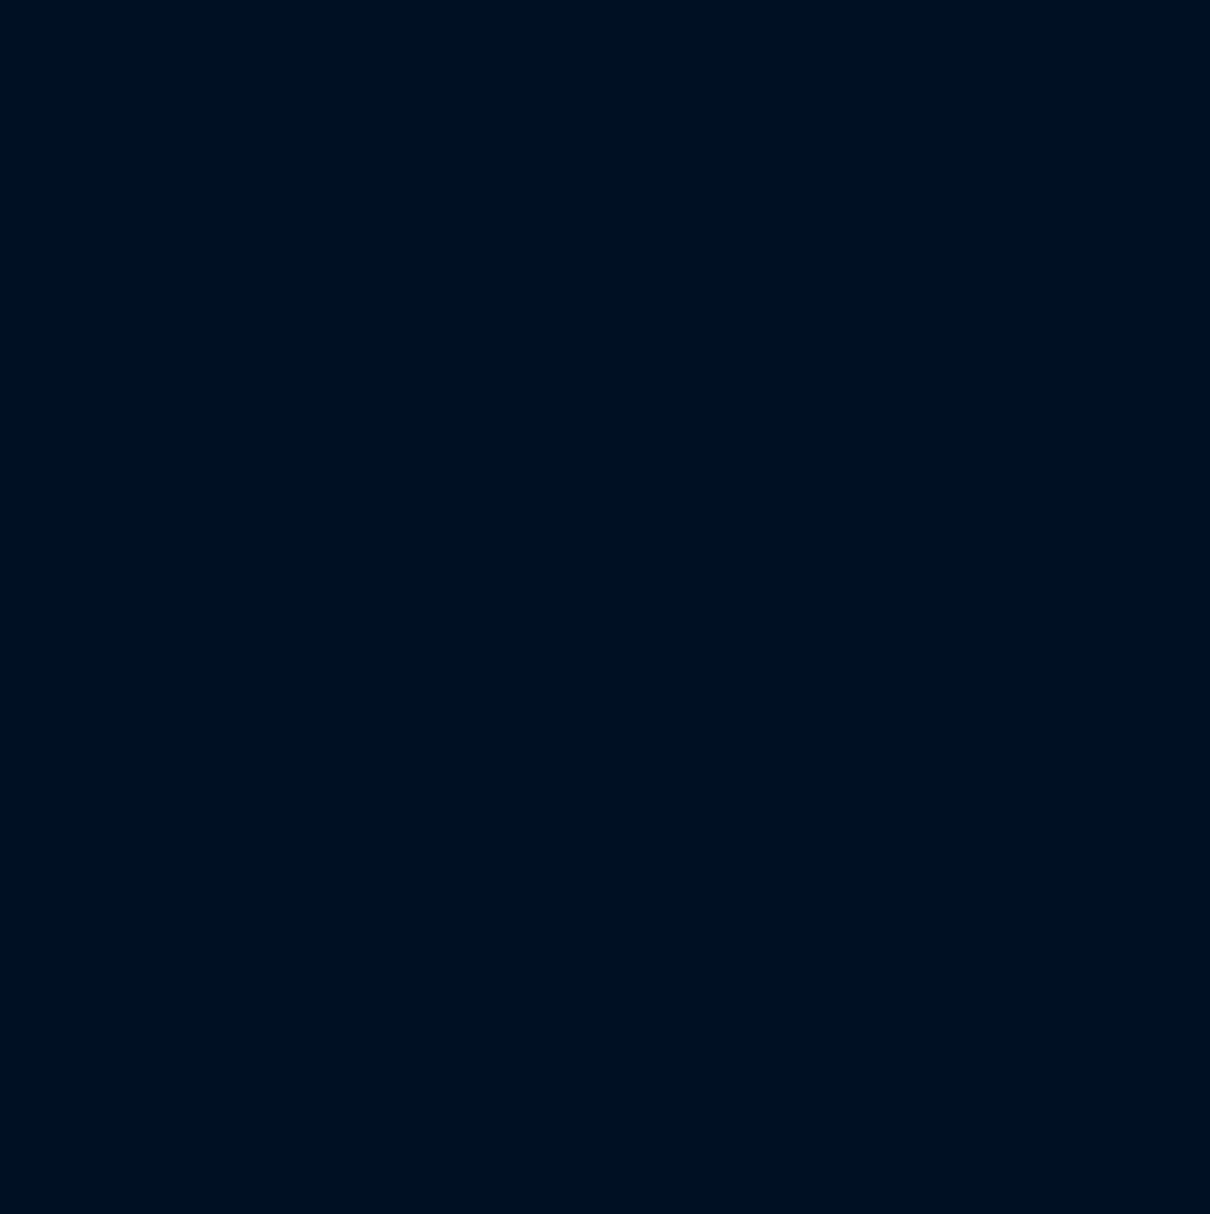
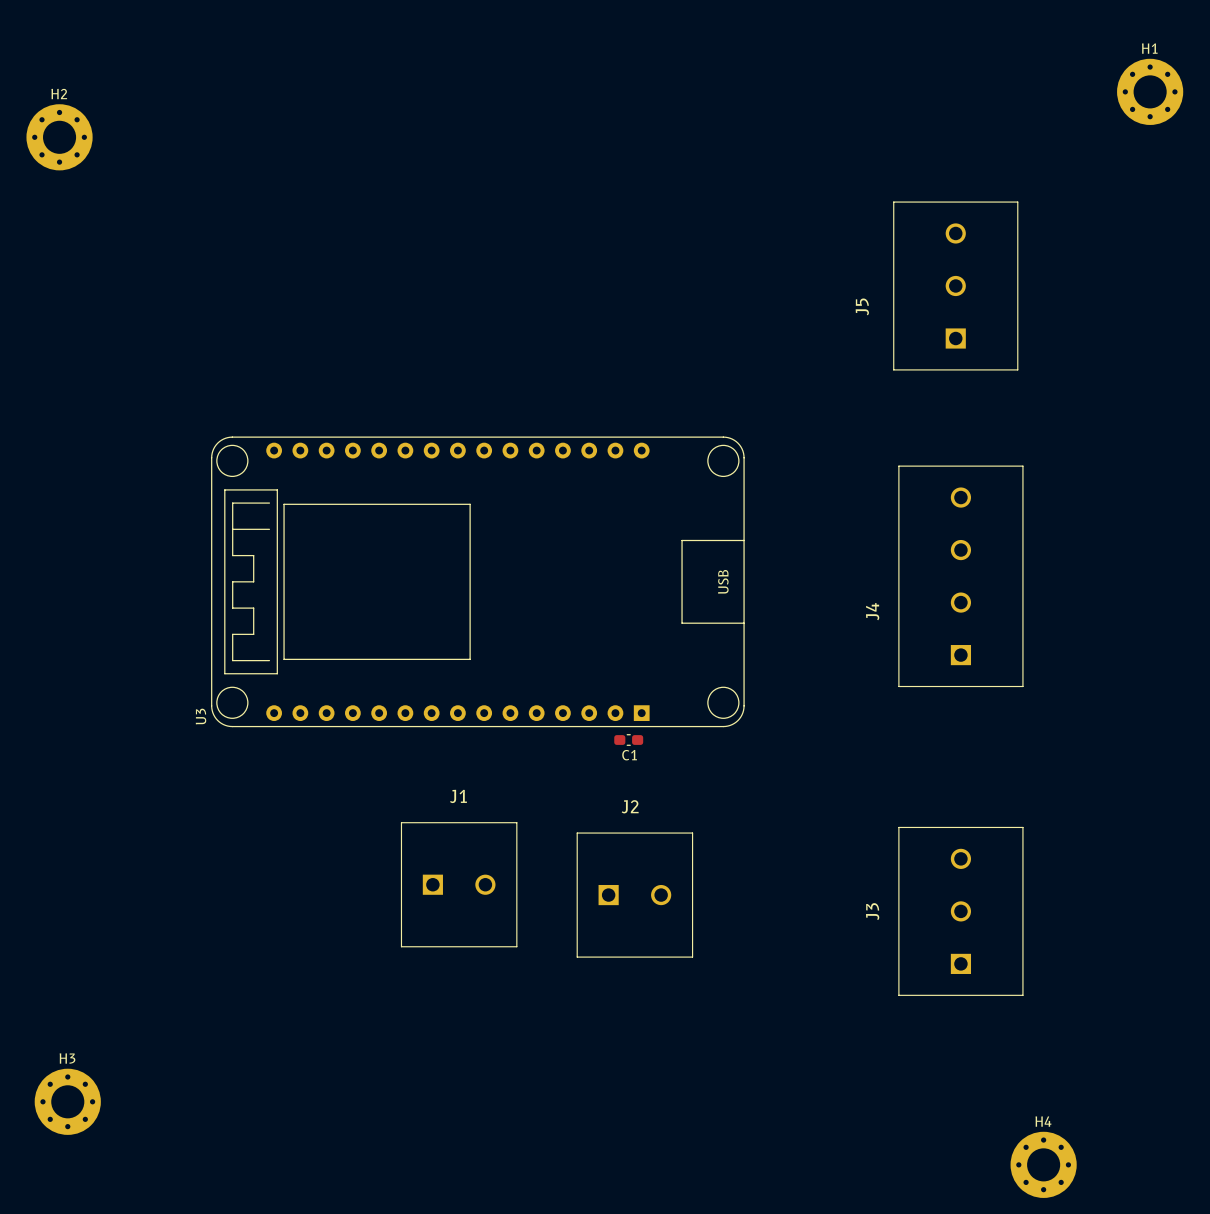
H1: none -> (1150, 91)
H2: none -> (59, 137)
J5: none -> (955, 285)
J4: none -> (960, 576)
U3: none -> (477, 581)
C1: none -> (628, 740)
J1: none -> (459, 884)
J2: none -> (634, 895)
J3: none -> (960, 911)
H3: none -> (67, 1101)
H4: none -> (1043, 1164)

